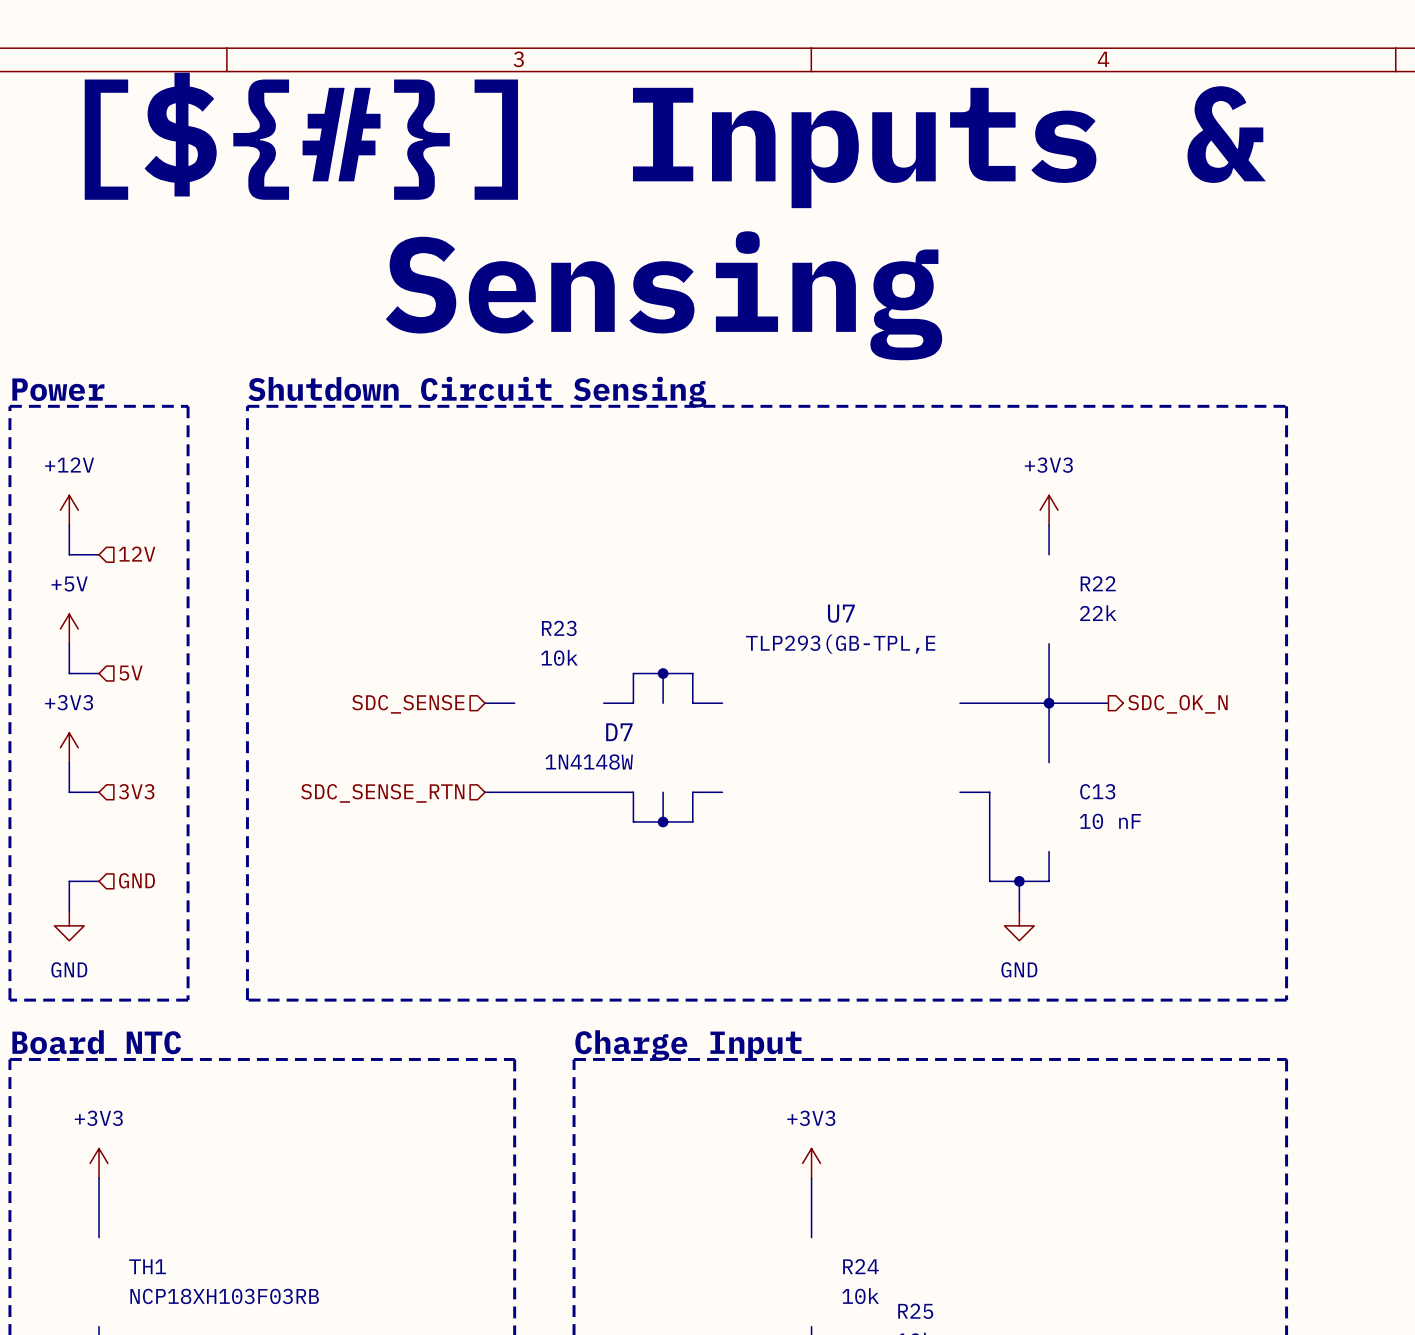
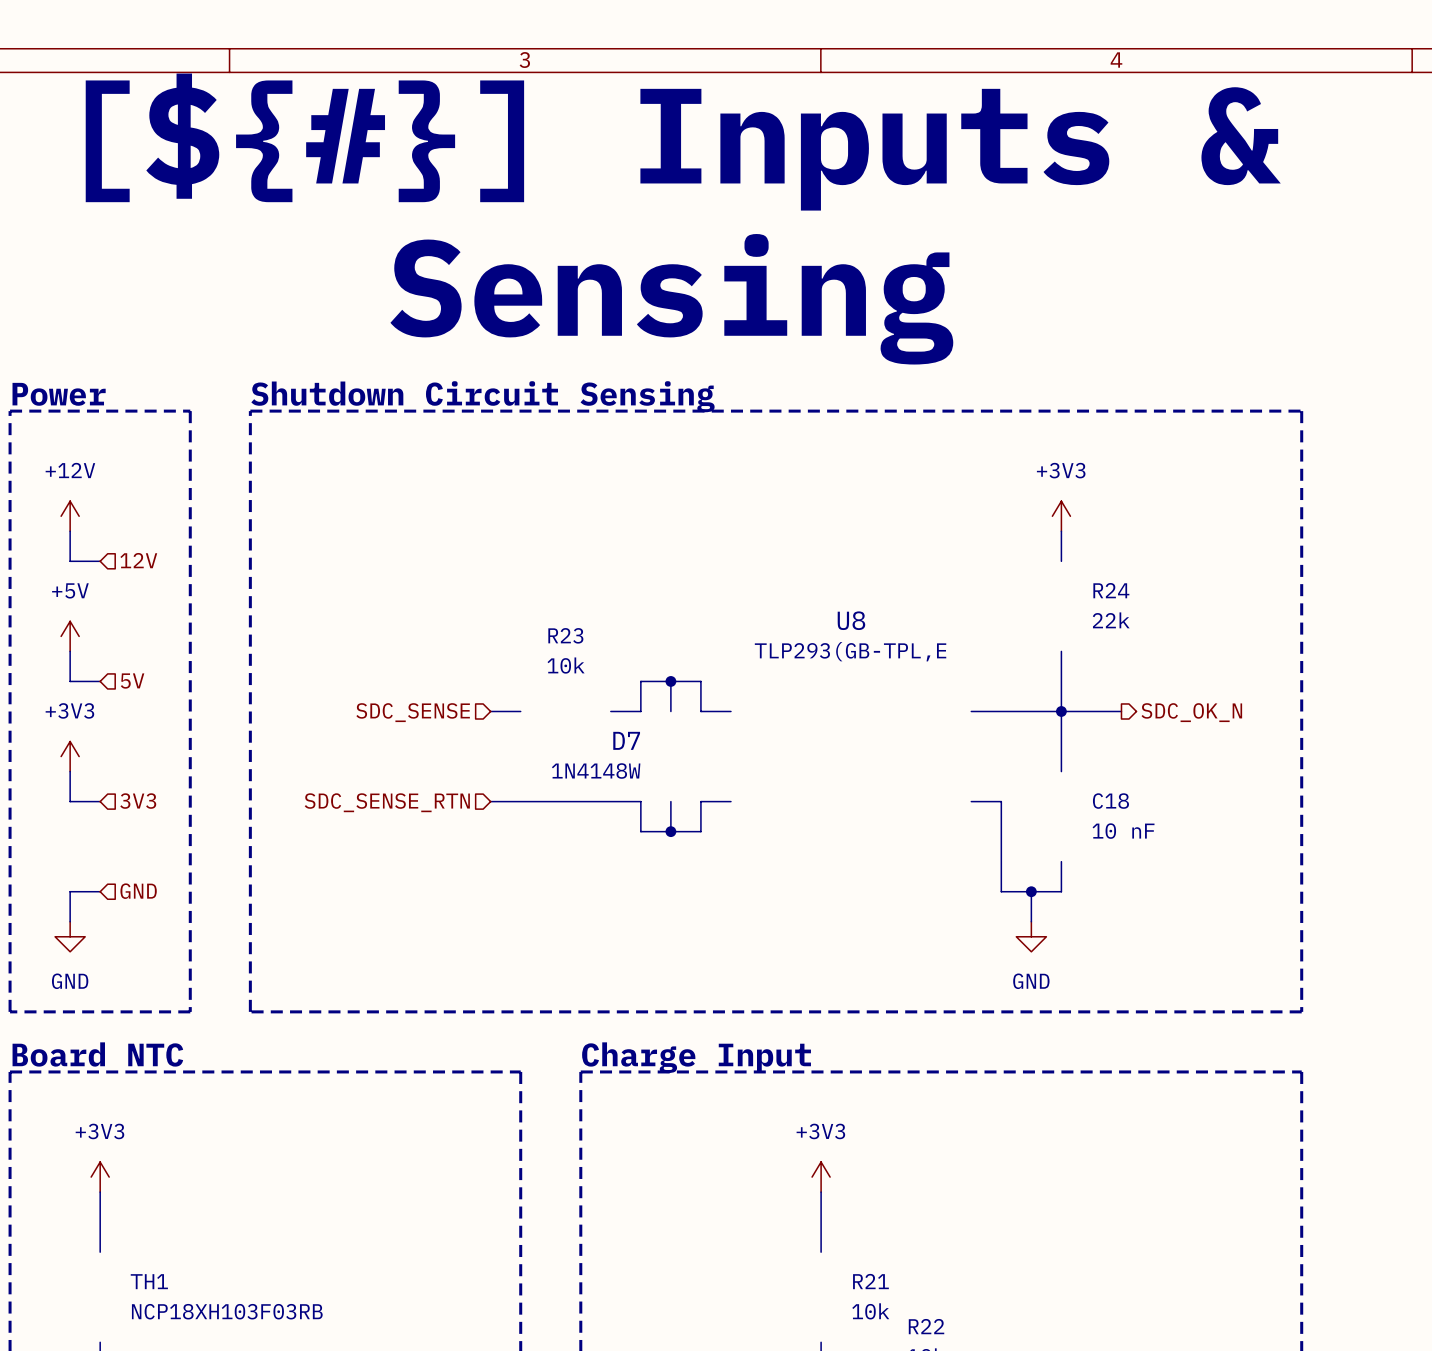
R22 name: R22 (1098, 583) -> R24 (1111, 590)
U7 name: U7 (841, 613) -> U8 (851, 620)
C13 name: C13 (1097, 791) -> C18 (1110, 801)
R24 name: R24 (860, 1266) -> R21 (870, 1281)
R25 name: R25 (915, 1311) -> R22 (926, 1326)

